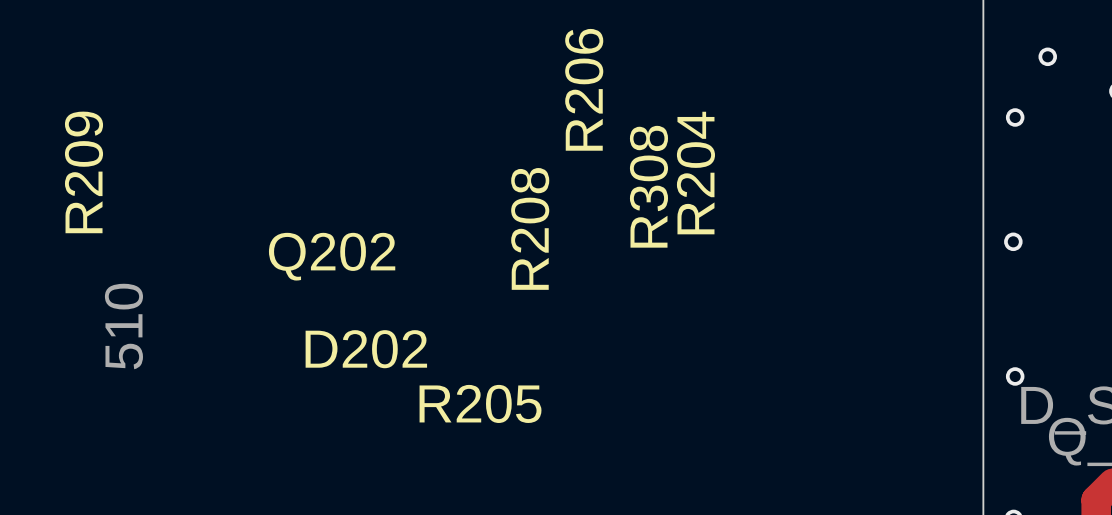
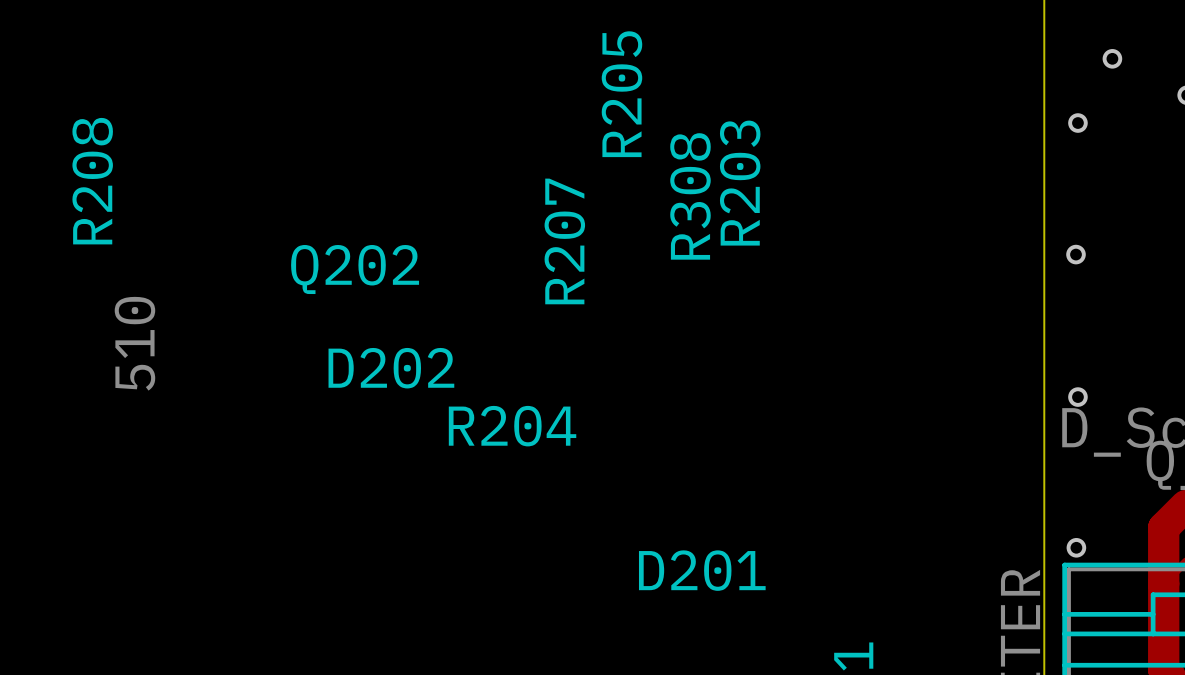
R206 name: R206 (584, 89) -> R205 (621, 94)
R209 name: R209 (84, 172) -> R208 (92, 181)
R204 name: R204 (695, 173) -> R203 (740, 183)
R208 name: R208 (530, 228) -> R207 (564, 241)
R205 name: R205 (480, 403) -> R204 (512, 426)

